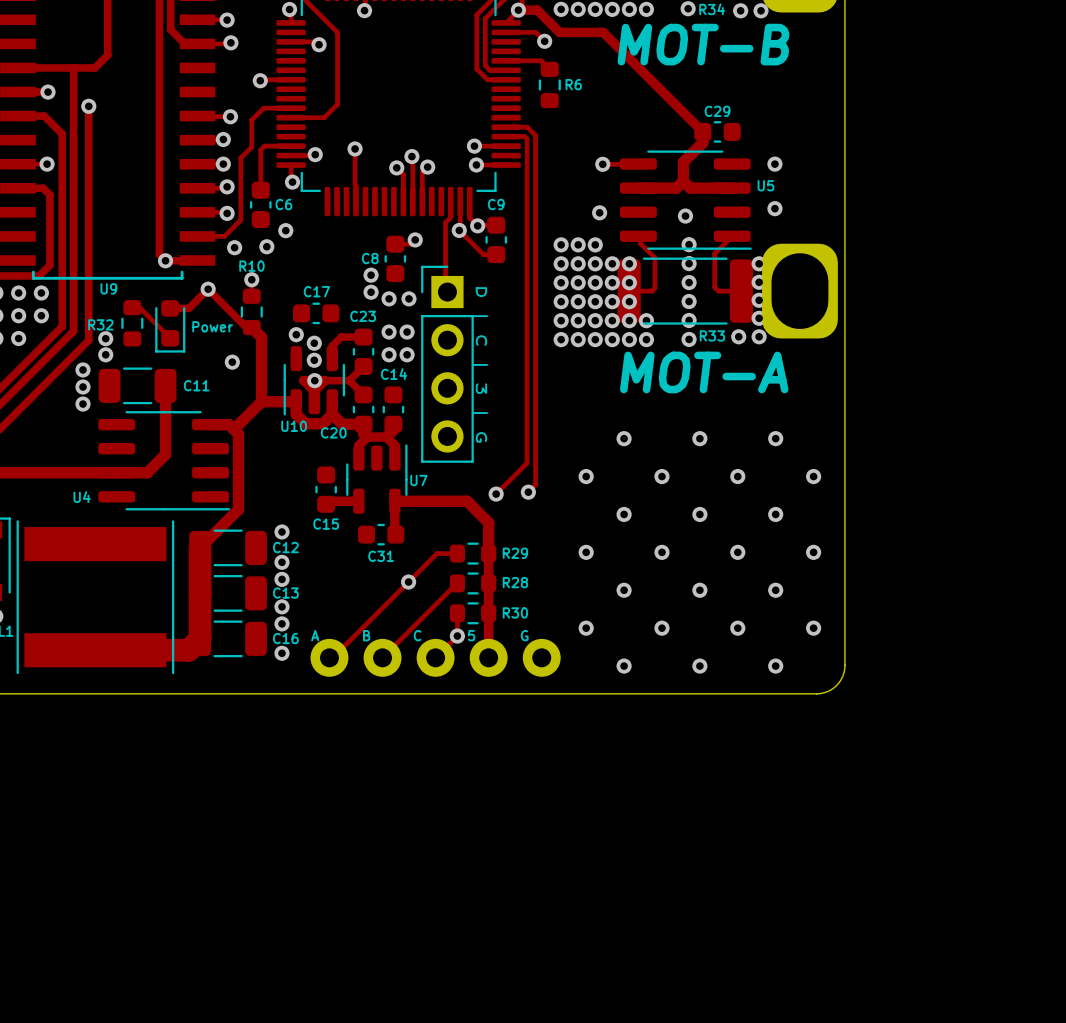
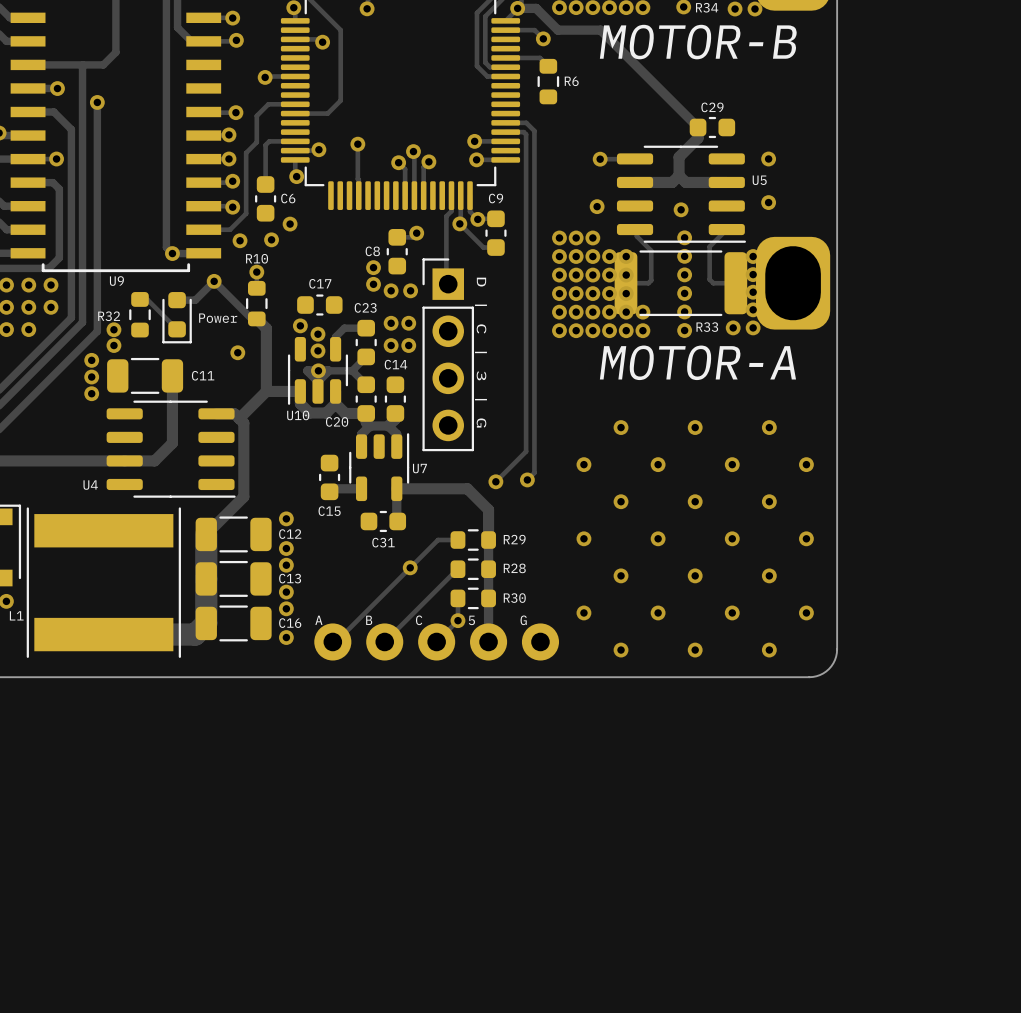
text: MOT-B (703, 44) -> MOTOR-B (698, 42)
text: MOT-A (704, 372) -> MOTOR-A (697, 362)

